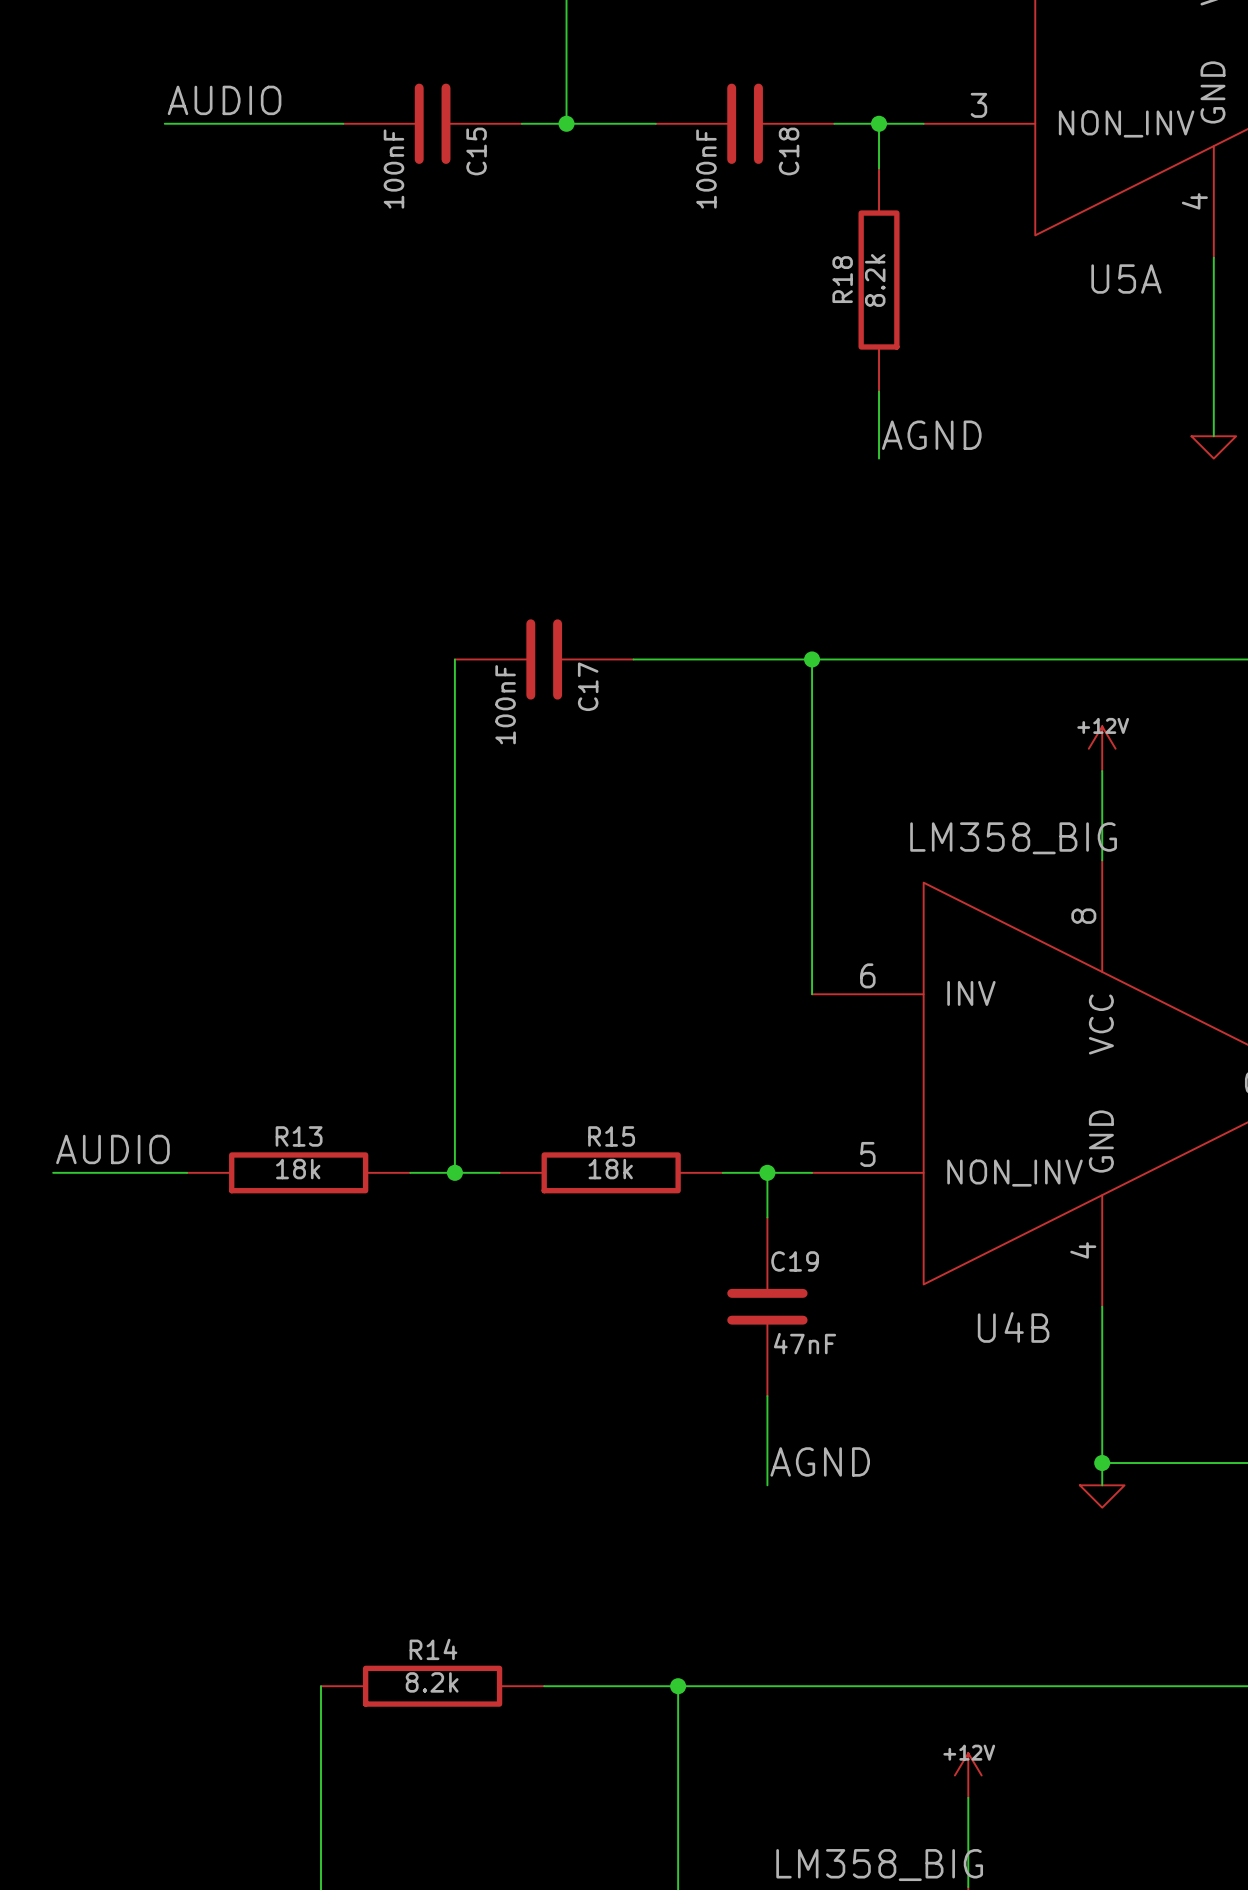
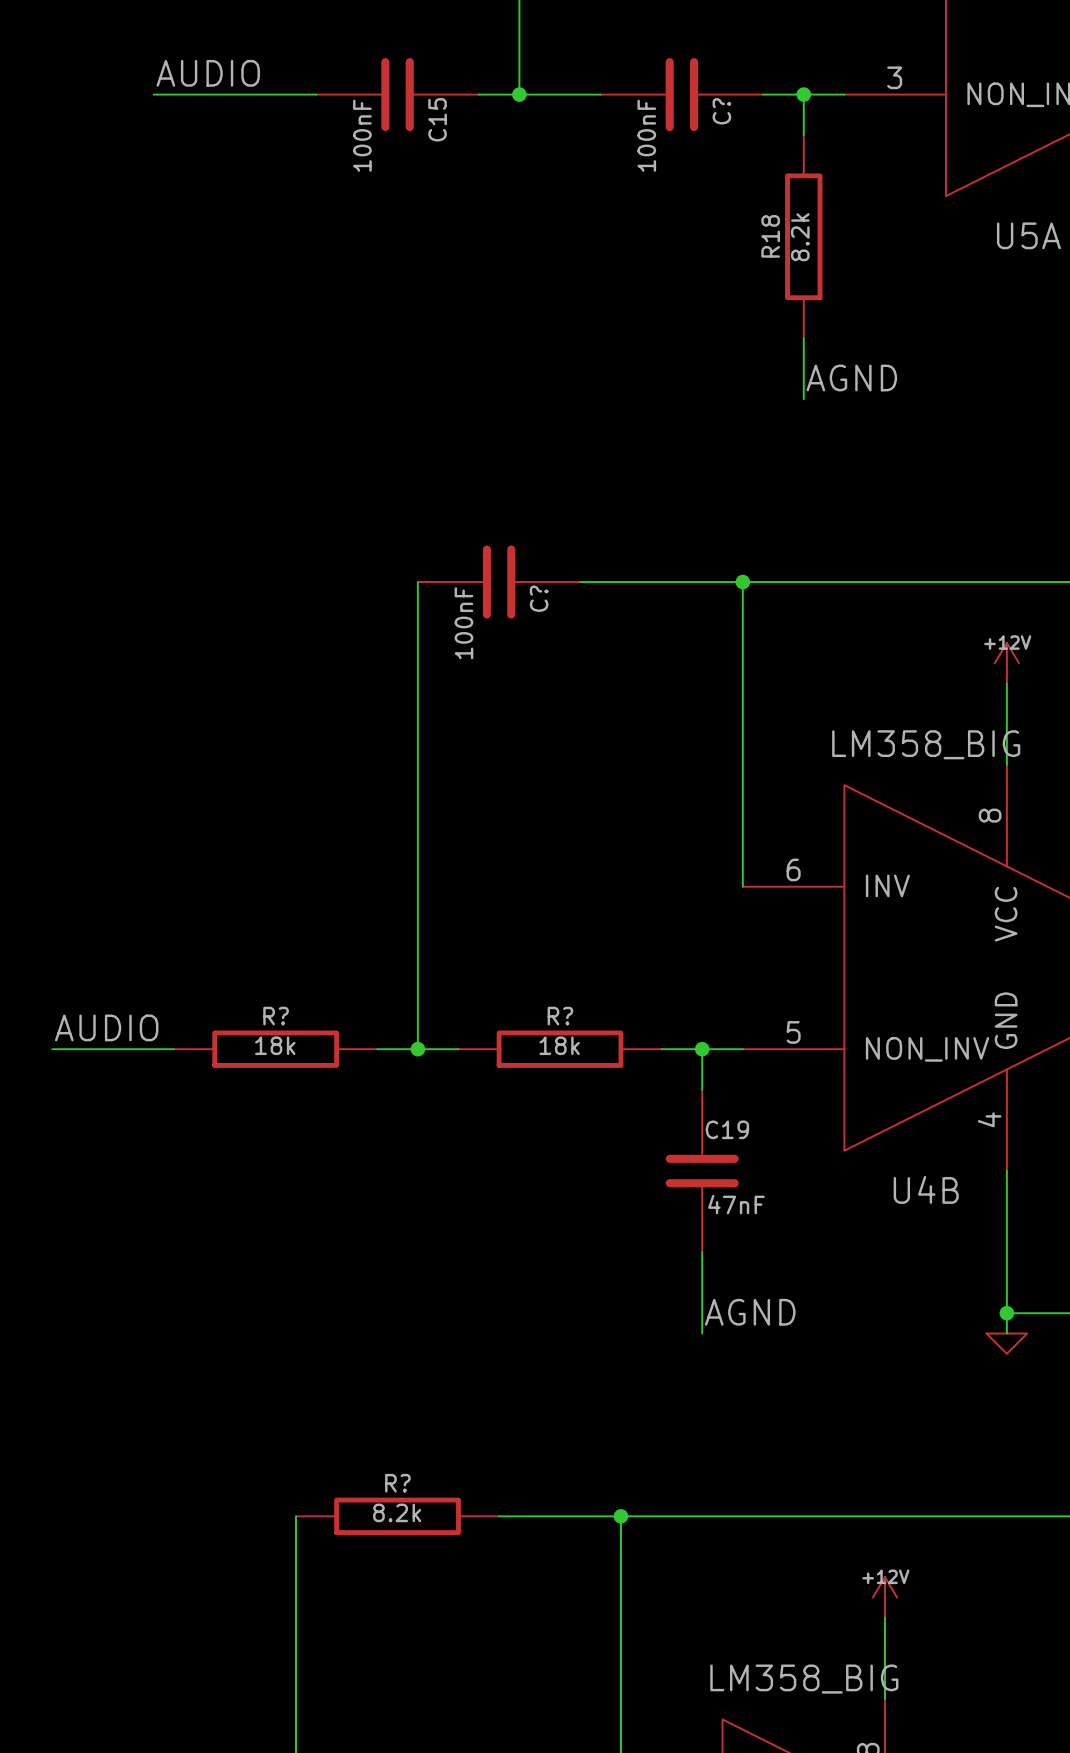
C18 name: C18 (789, 151) -> C? (721, 111)
C17 name: C17 (588, 686) -> C? (539, 598)
R13 name: R13 (299, 1136) -> R? (276, 1016)
R15 name: R15 (611, 1136) -> R? (560, 1016)
R14 name: R14 (433, 1649) -> R? (397, 1483)

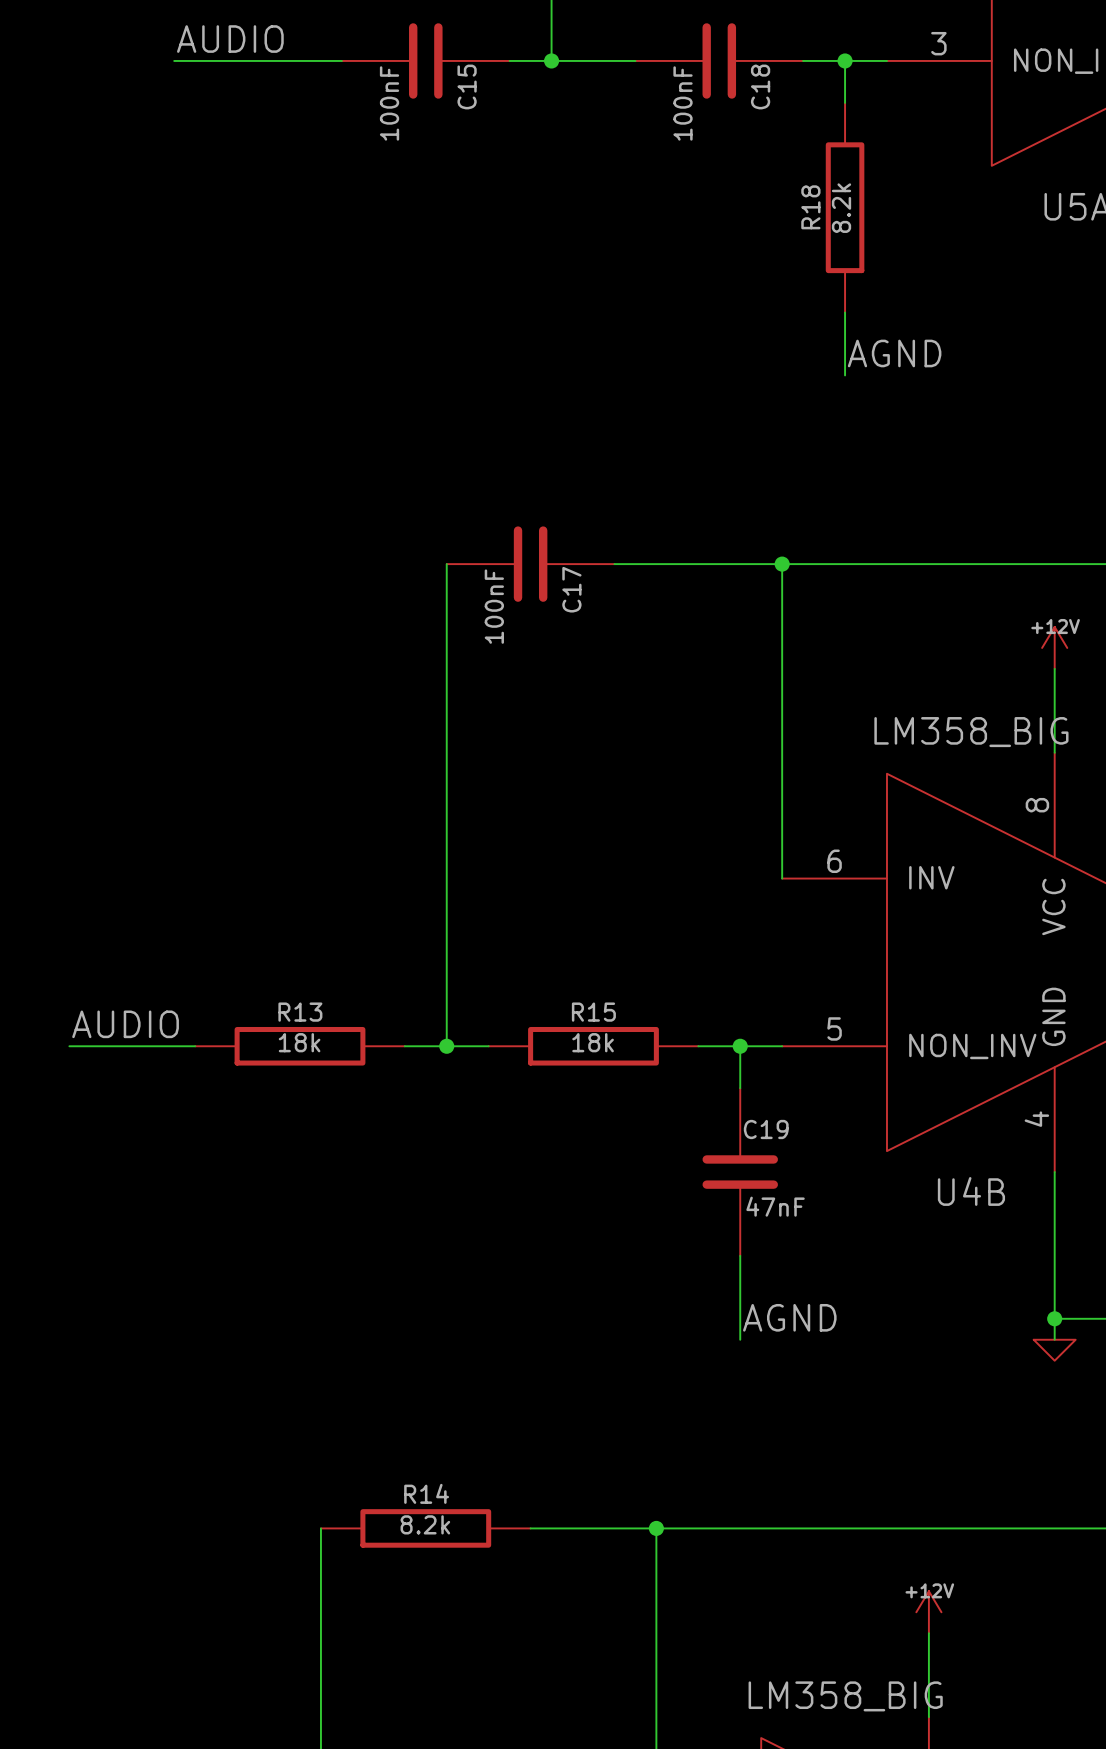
C? name: C? (721, 111) -> C18 (760, 86)
C? name: C? (539, 598) -> C17 (571, 589)
R? name: R? (276, 1016) -> R13 (300, 1012)
R? name: R? (560, 1016) -> R15 (593, 1012)
R? name: R? (397, 1483) -> R14 (426, 1493)

